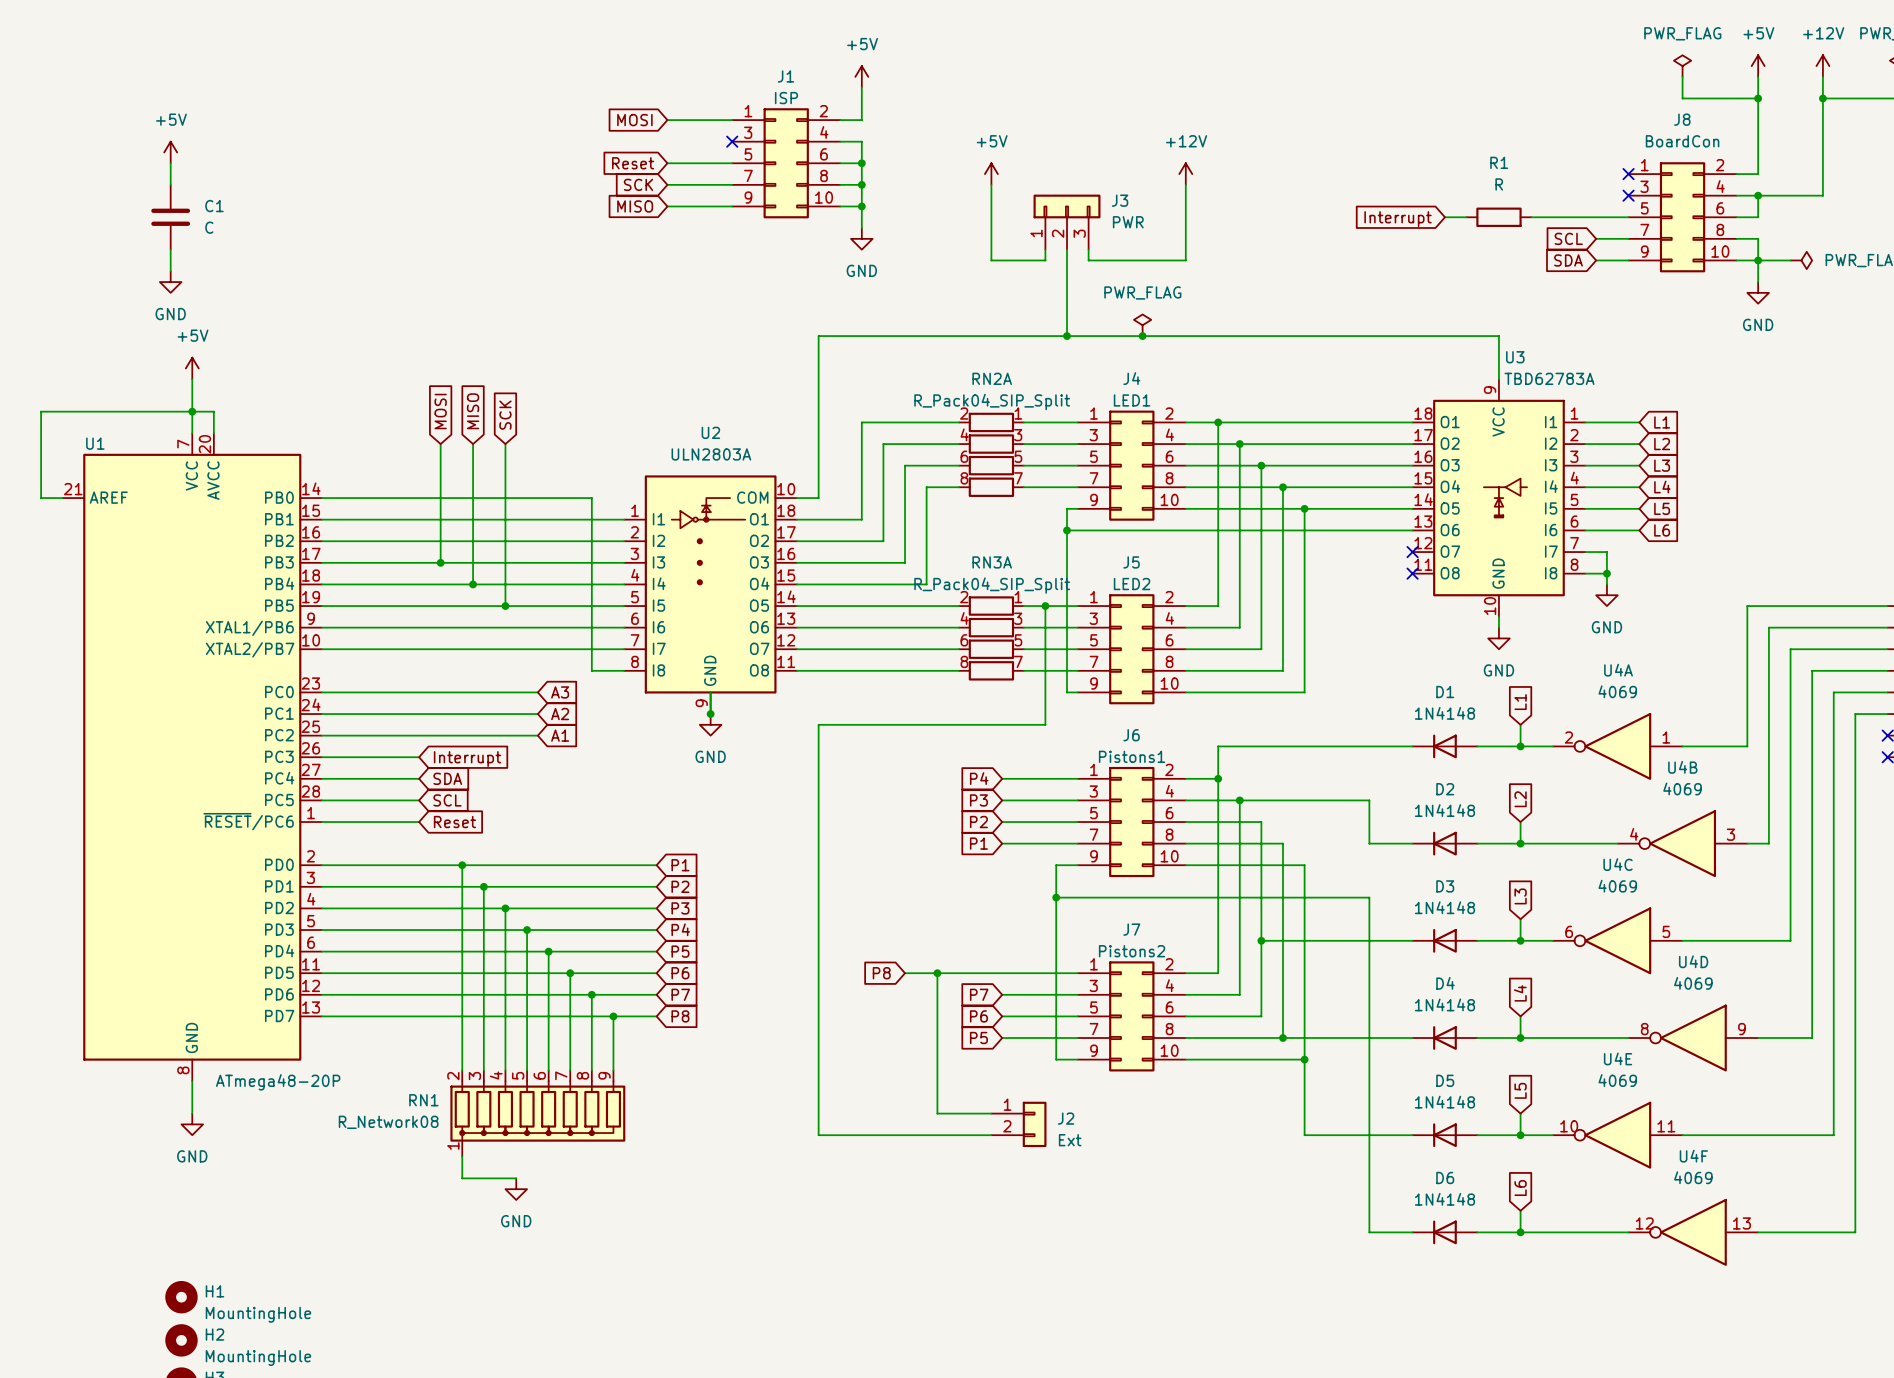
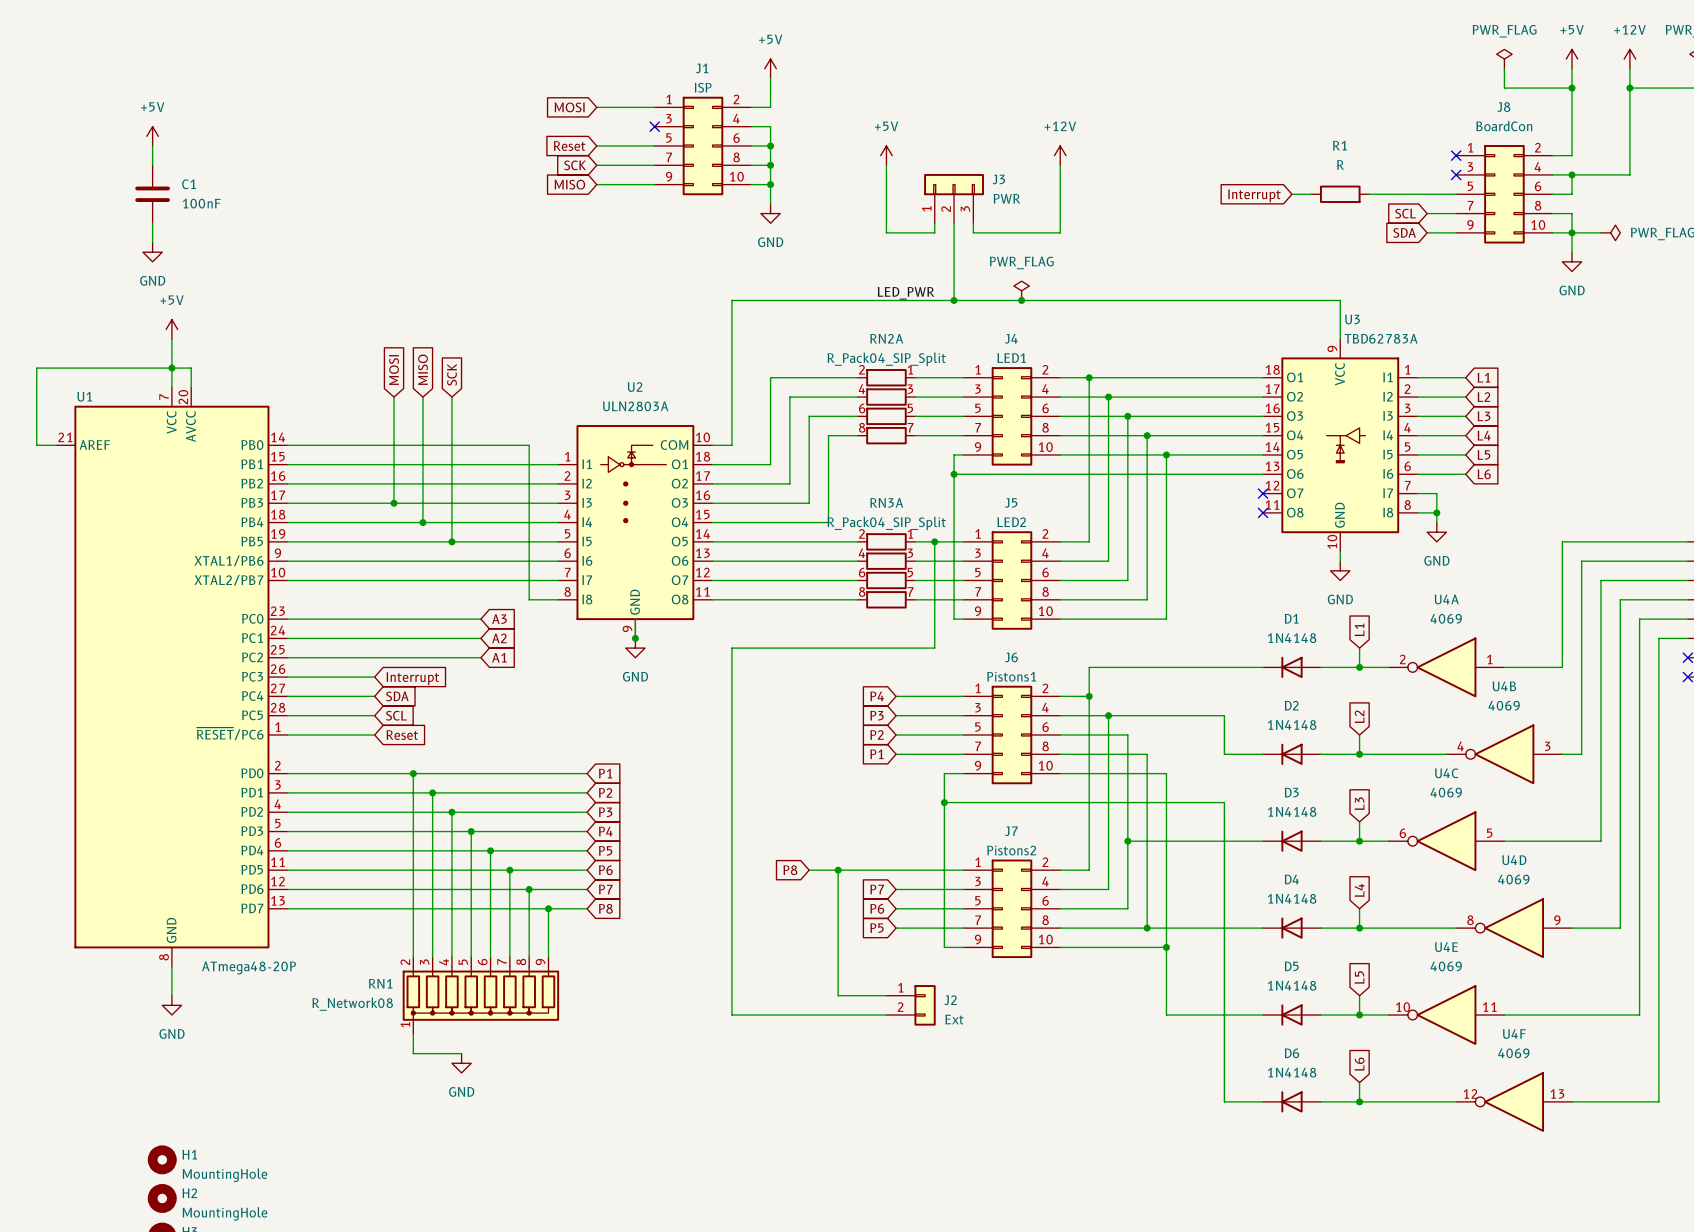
C1 value: C (209, 227) -> 100nF (201, 203)
label: none -> LED_PWR (905, 293)

